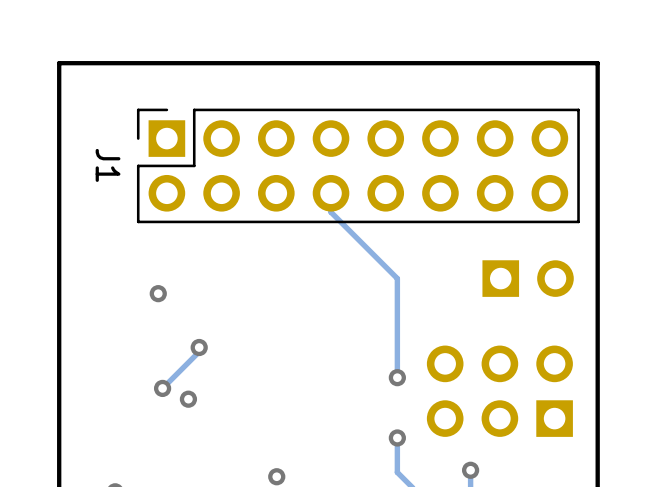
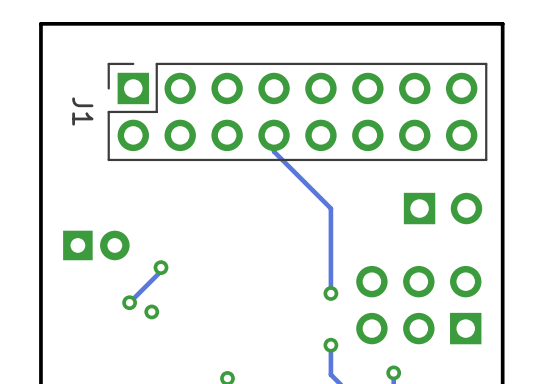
via: (158, 293) -> none
part: none -> (96, 245)

